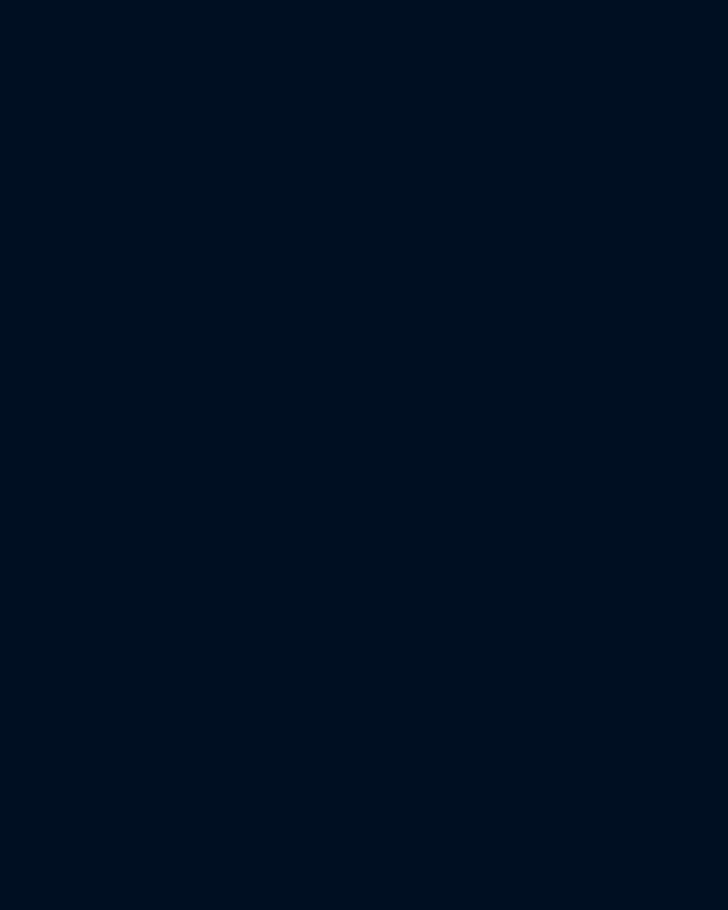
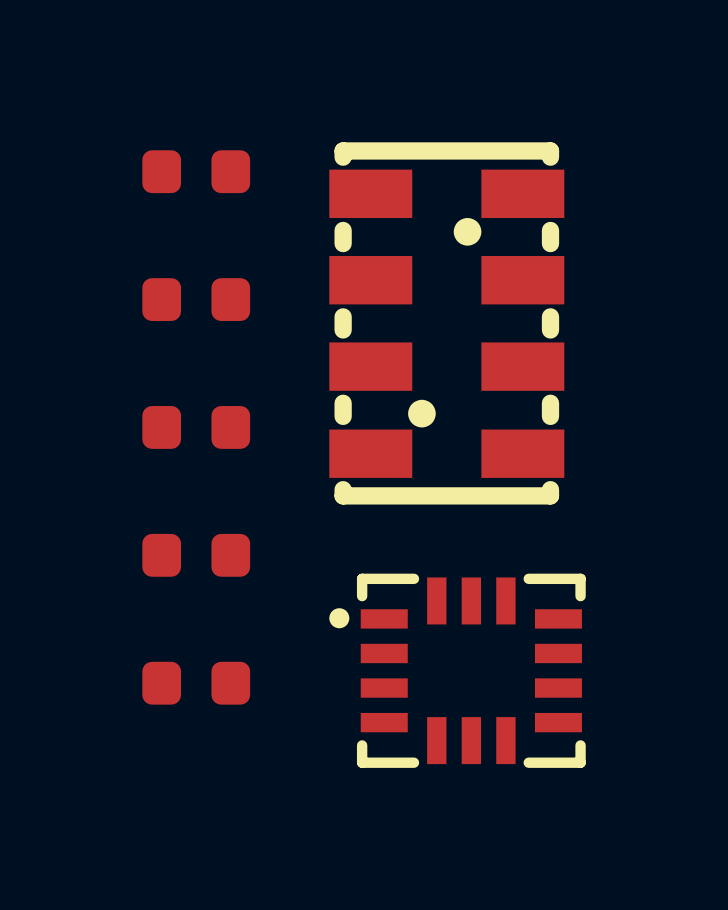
part: none -> (196, 171)
part: none -> (196, 299)
part: none -> (446, 323)
part: none -> (196, 427)
part: none -> (196, 555)
part: none -> (457, 670)
part: none -> (196, 683)

